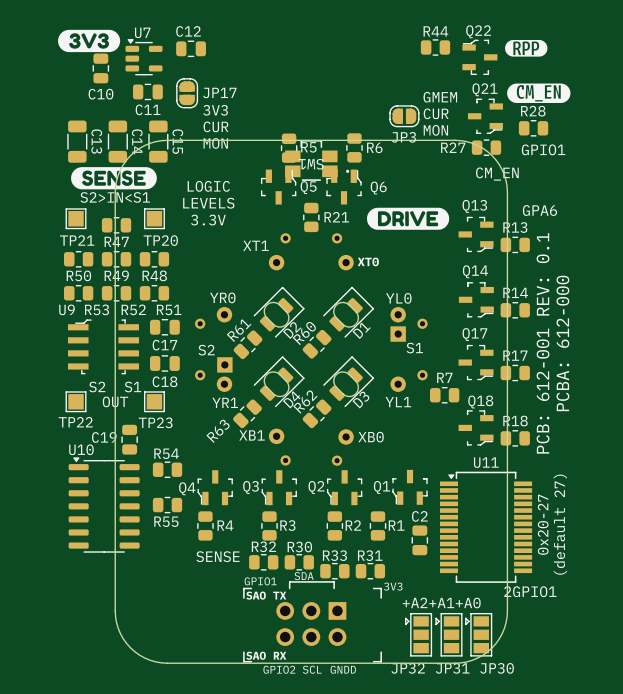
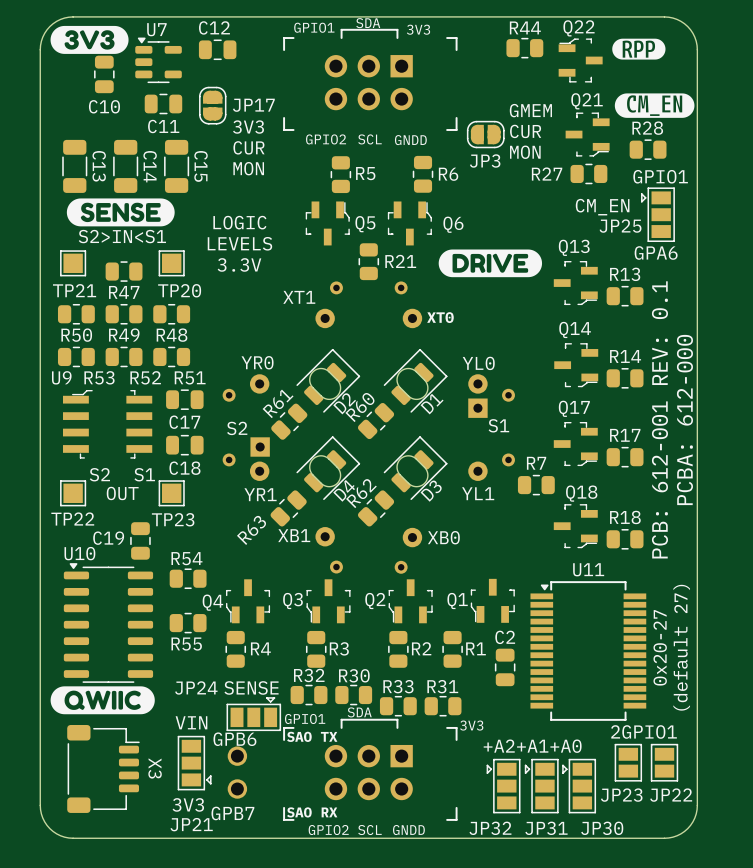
part: none -> (370, 79)
board edge: (455, 140) (161, 140) (139, 148) (123, 164) (118, 175) (115, 192) (115, 610) (116, 622) (123, 638) (139, 655) (155, 661) (167, 663) (455, 663) (477, 658) (492, 647) (499, 638) (506, 622) (507, 610) (507, 186) (502, 169) (487, 151) (472, 143) (455, 140) -> (664, 16) (677, 19) (687, 26) (694, 37) (697, 49) (697, 805) (696, 813) (690, 825) (680, 833) (664, 838) (73, 838) (60, 835) (53, 831) (44, 821) (40, 805) (40, 49) (42, 37) (47, 29) (60, 19) (73, 16) (664, 16)
SW1: (317, 160) -> none
JP25: none -> (657, 214)
drawing: none -> [50, 686, 155, 715]
JP24: none -> (253, 714)
text: none -> VIN (191, 722)
text: none -> GPB6 (234, 739)
part: none -> (237, 756)
JP21: none -> (194, 763)
JP23: none -> (628, 762)
JP22: none -> (664, 762)
X3: none -> (103, 768)
part: none -> (237, 788)
text: none -> 3V3 (188, 804)
text: none -> GPB7 (232, 813)

